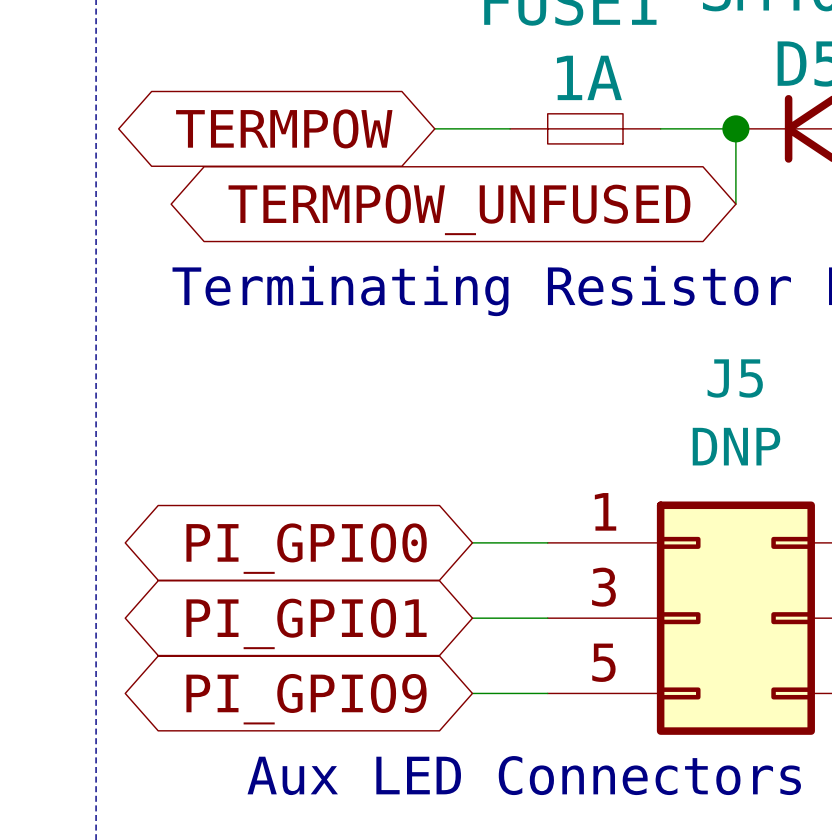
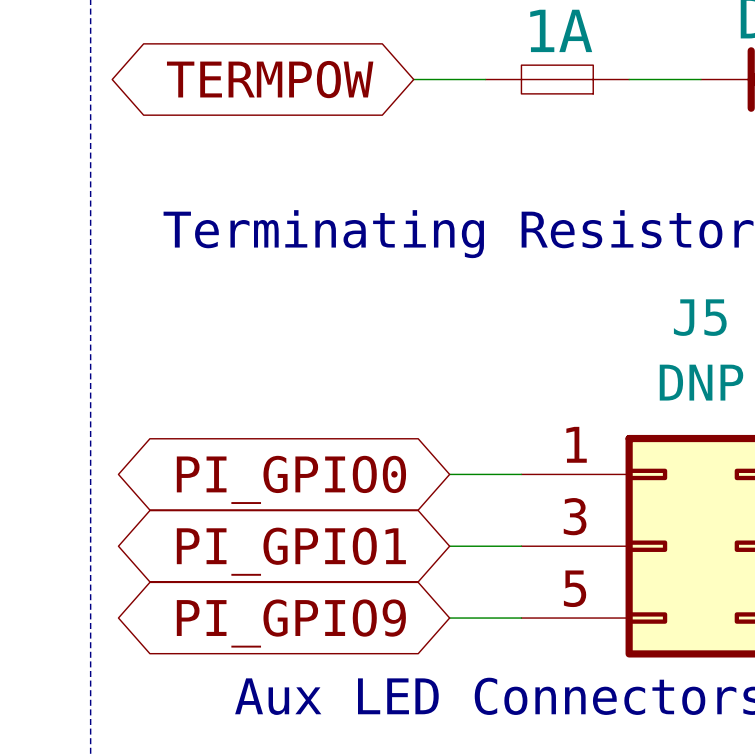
wire: (735, 128) (735, 204) -> none
junction: (735, 128) -> none
global label: TERMPOW_UNFUSED (459, 209) -> none

